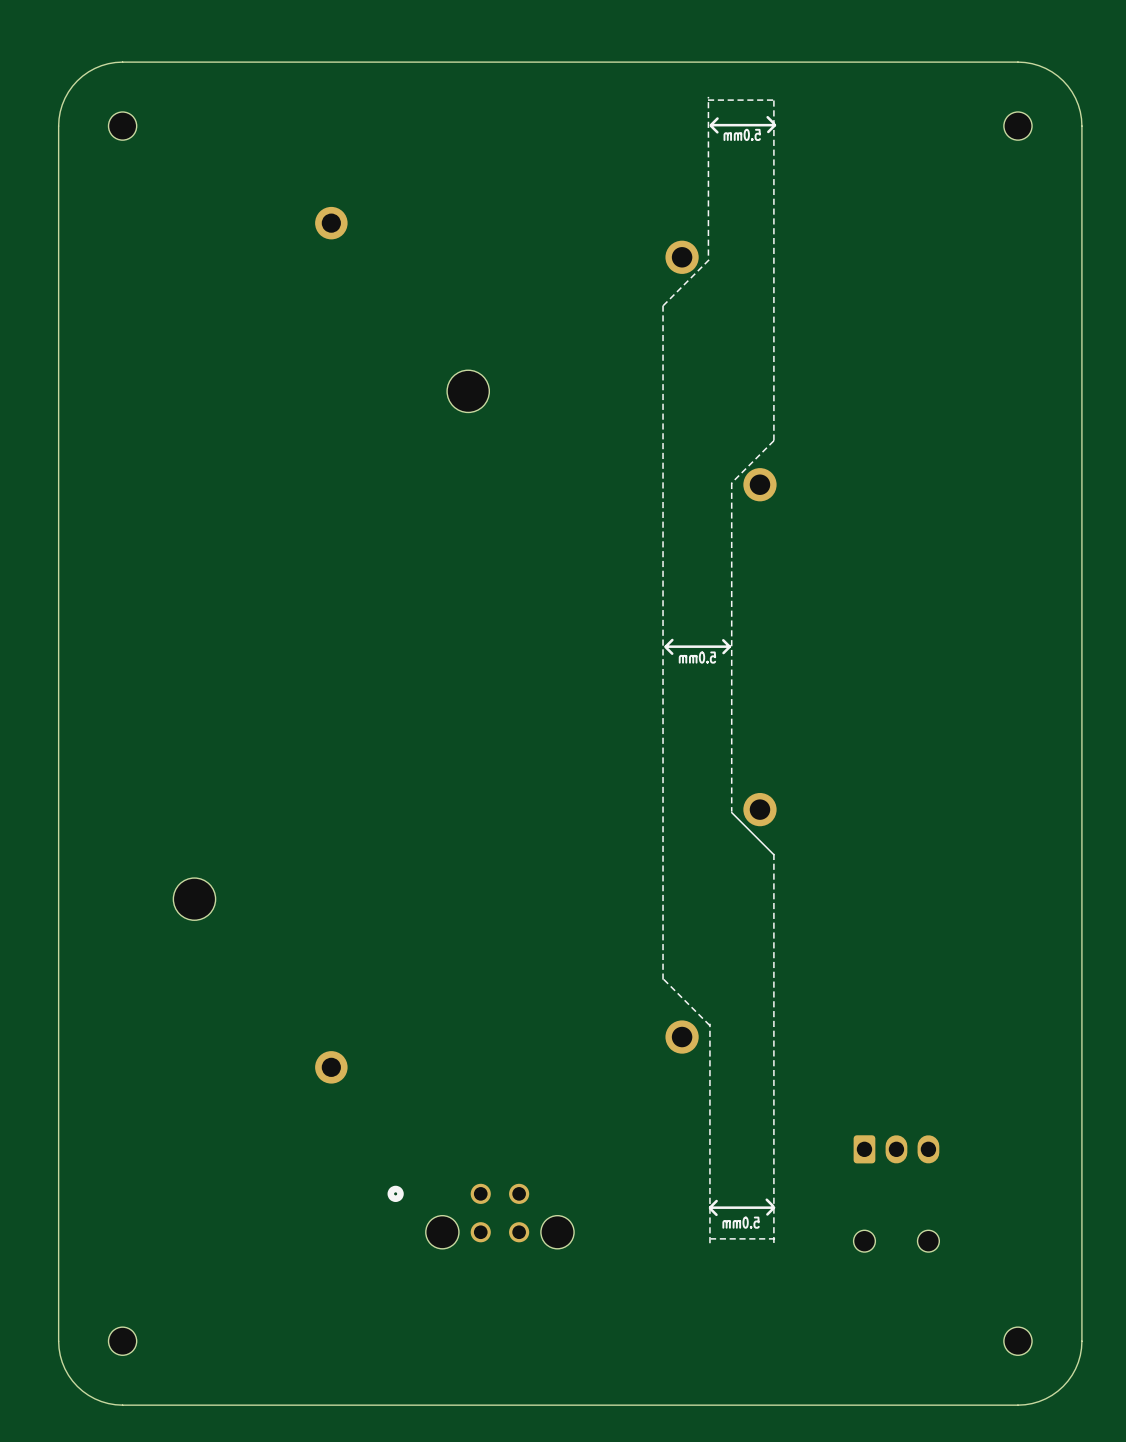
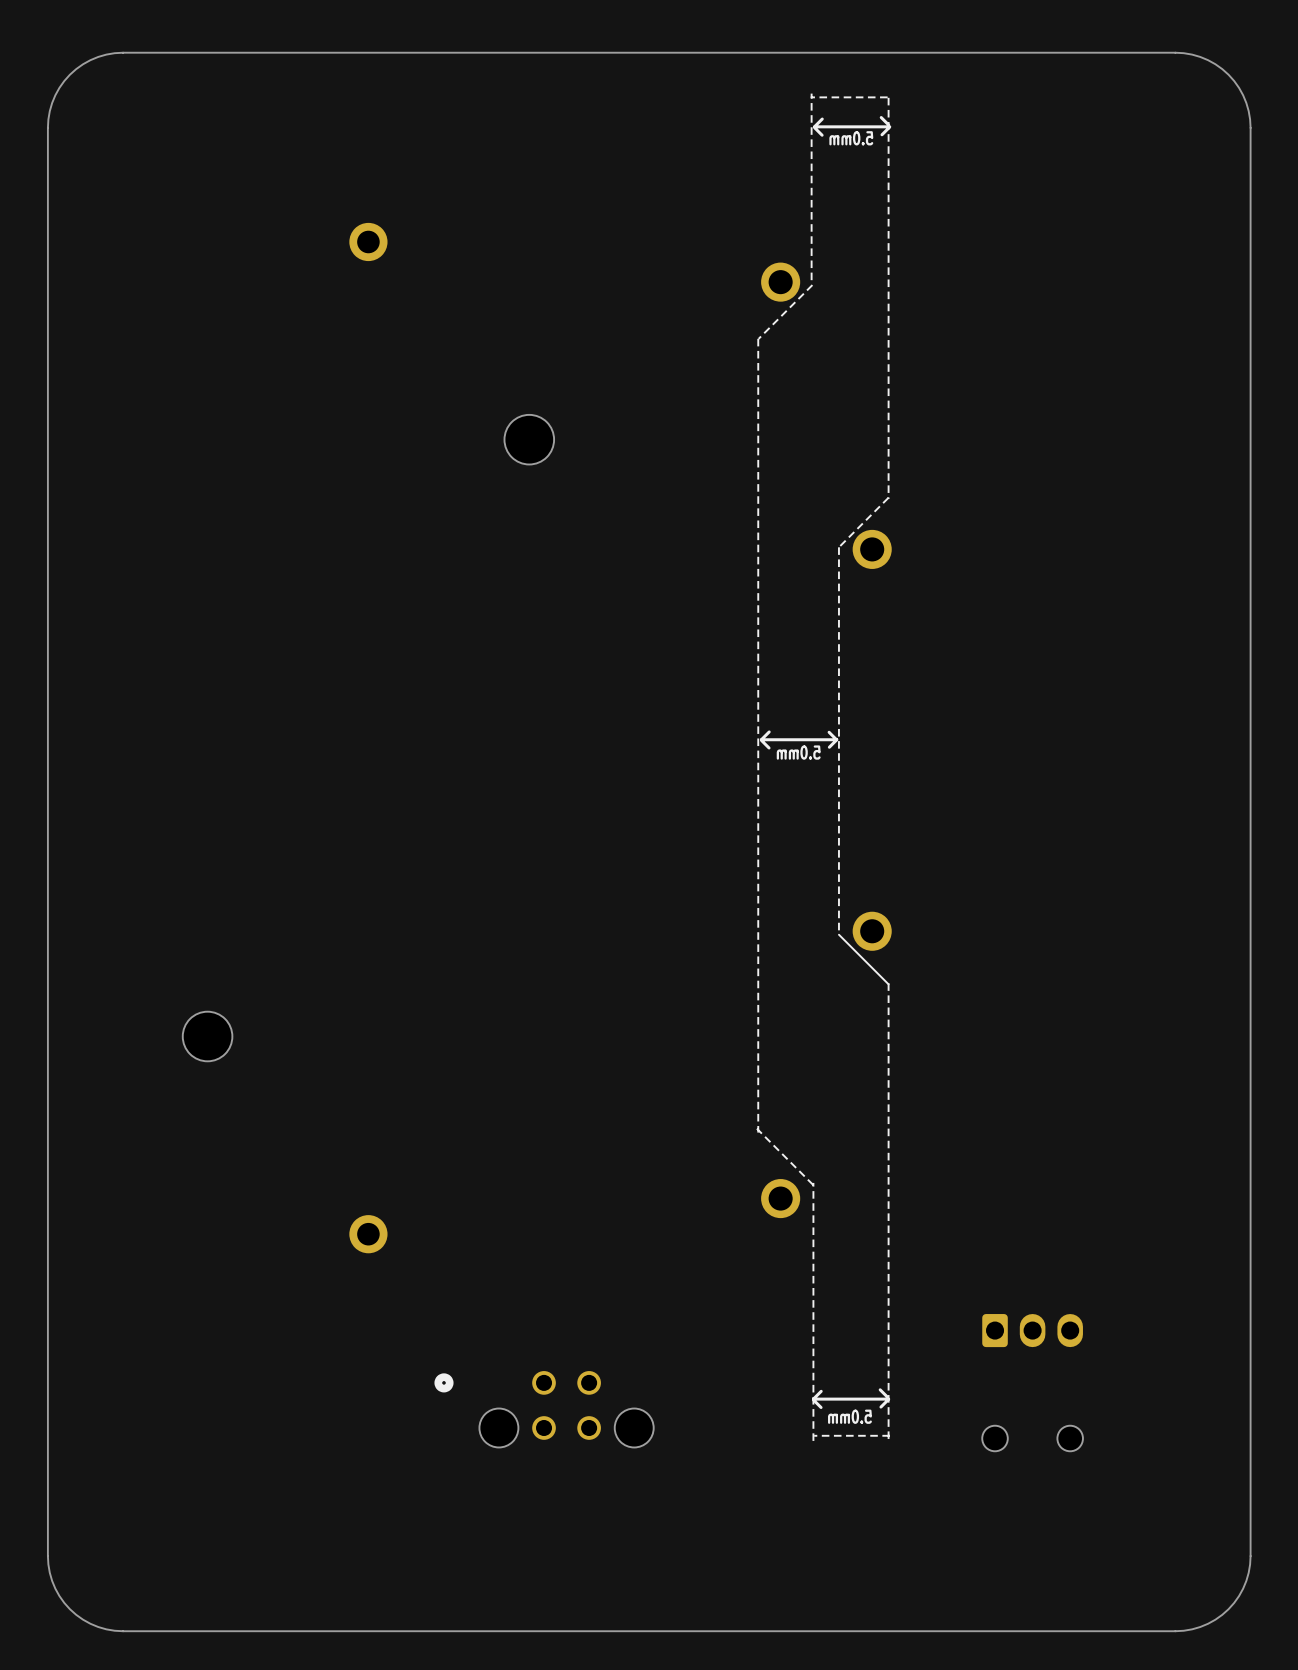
part: (122, 126) -> none
part: (1017, 126) -> none
part: (122, 1341) -> none
part: (1017, 1341) -> none

